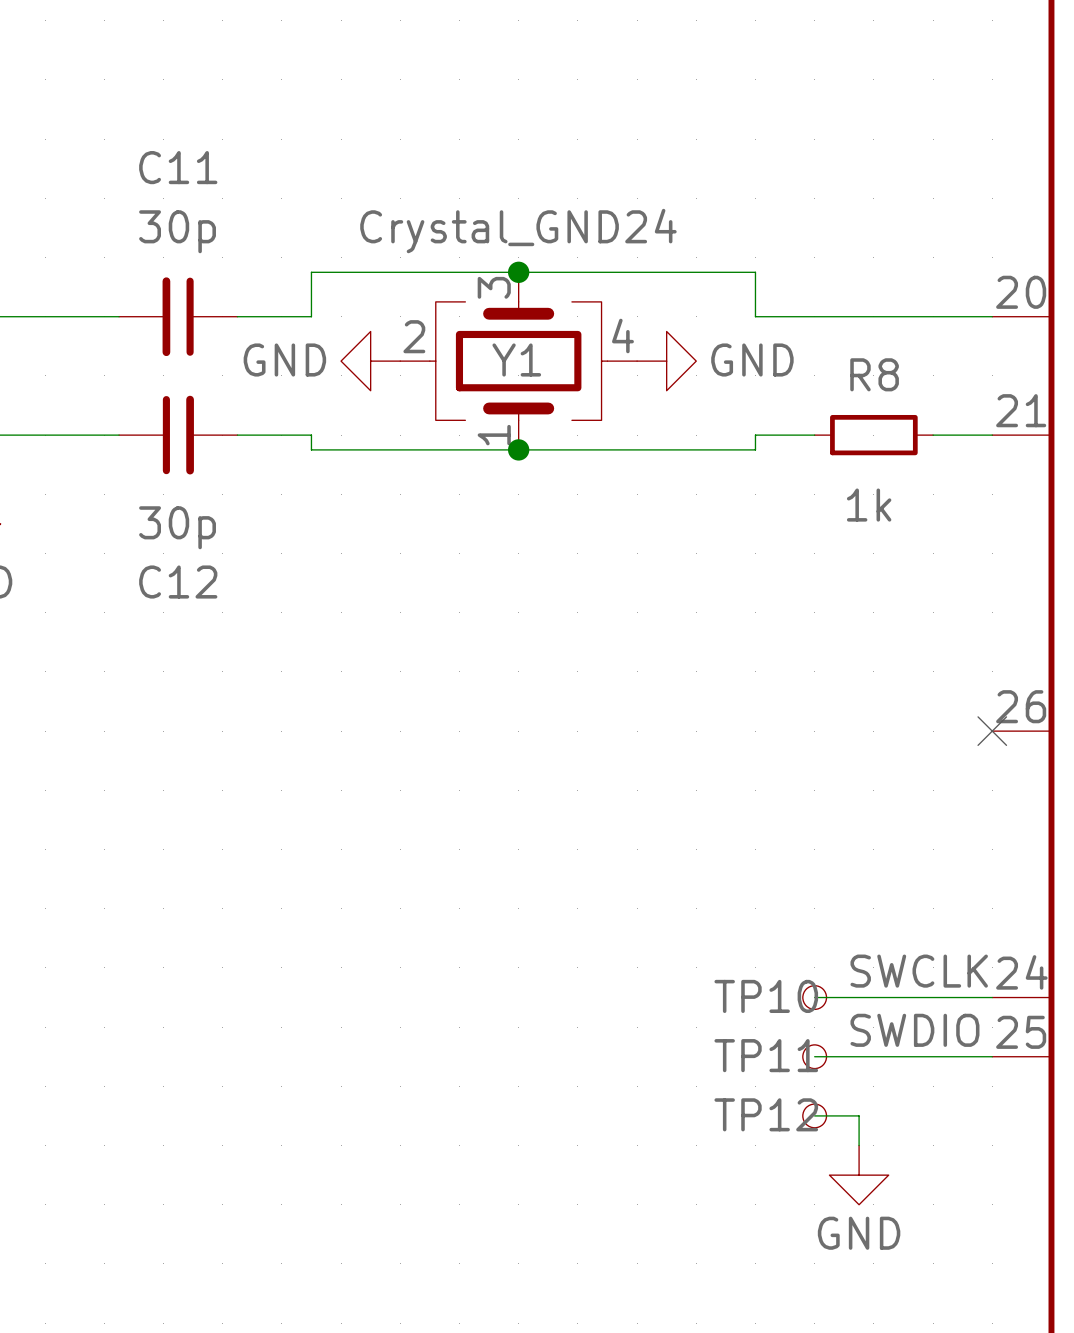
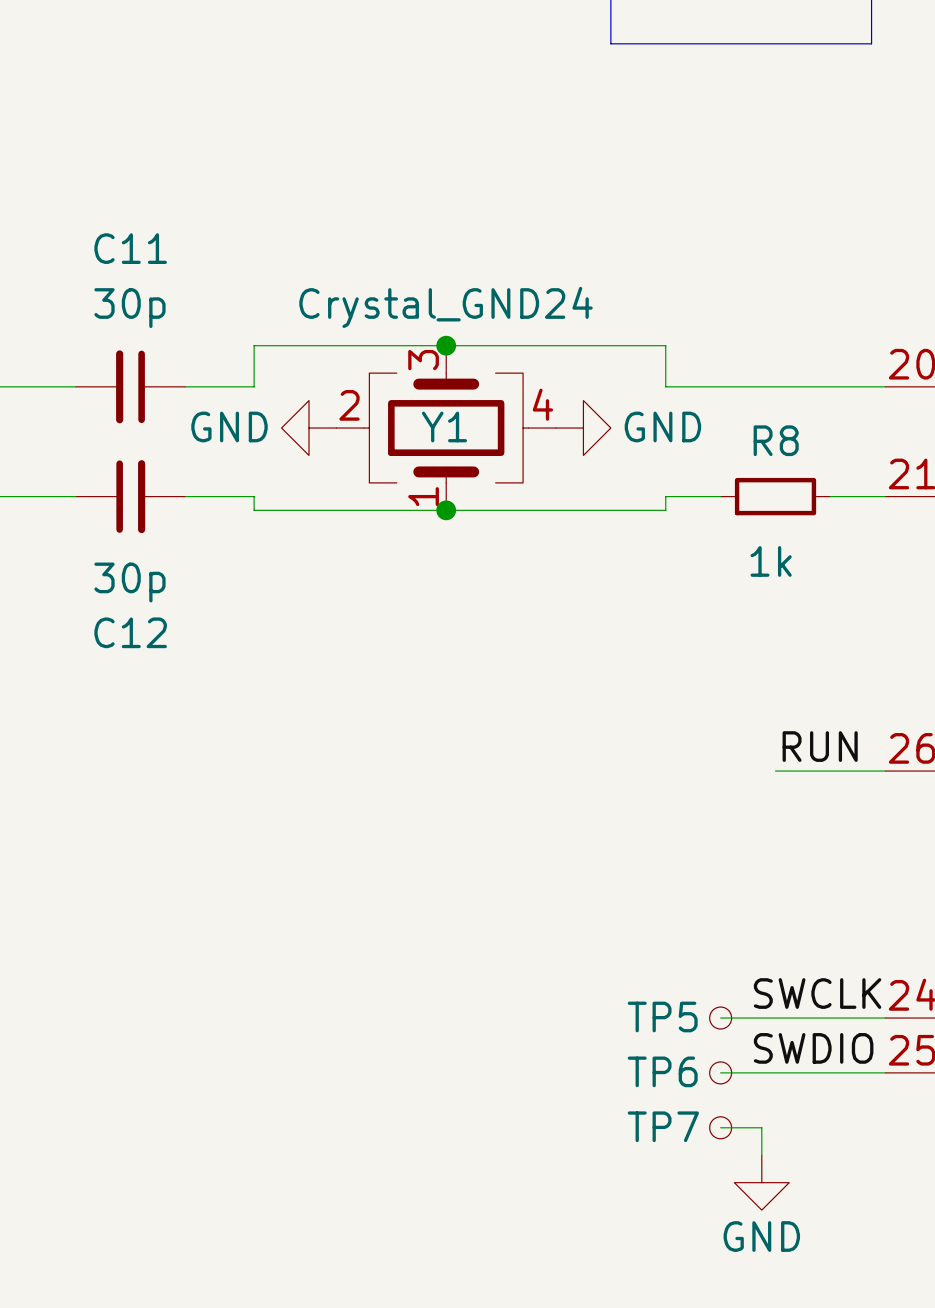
label: none -> RUN (820, 746)
wire: none -> (775, 771) (885, 771)
no-connect mark: (992, 731) -> none
TP10 name: TP10 (766, 996) -> TP5 (662, 1016)
TP11 name: TP11 (766, 1055) -> TP6 (662, 1071)
TP12 name: TP12 (766, 1114) -> TP7 (663, 1126)

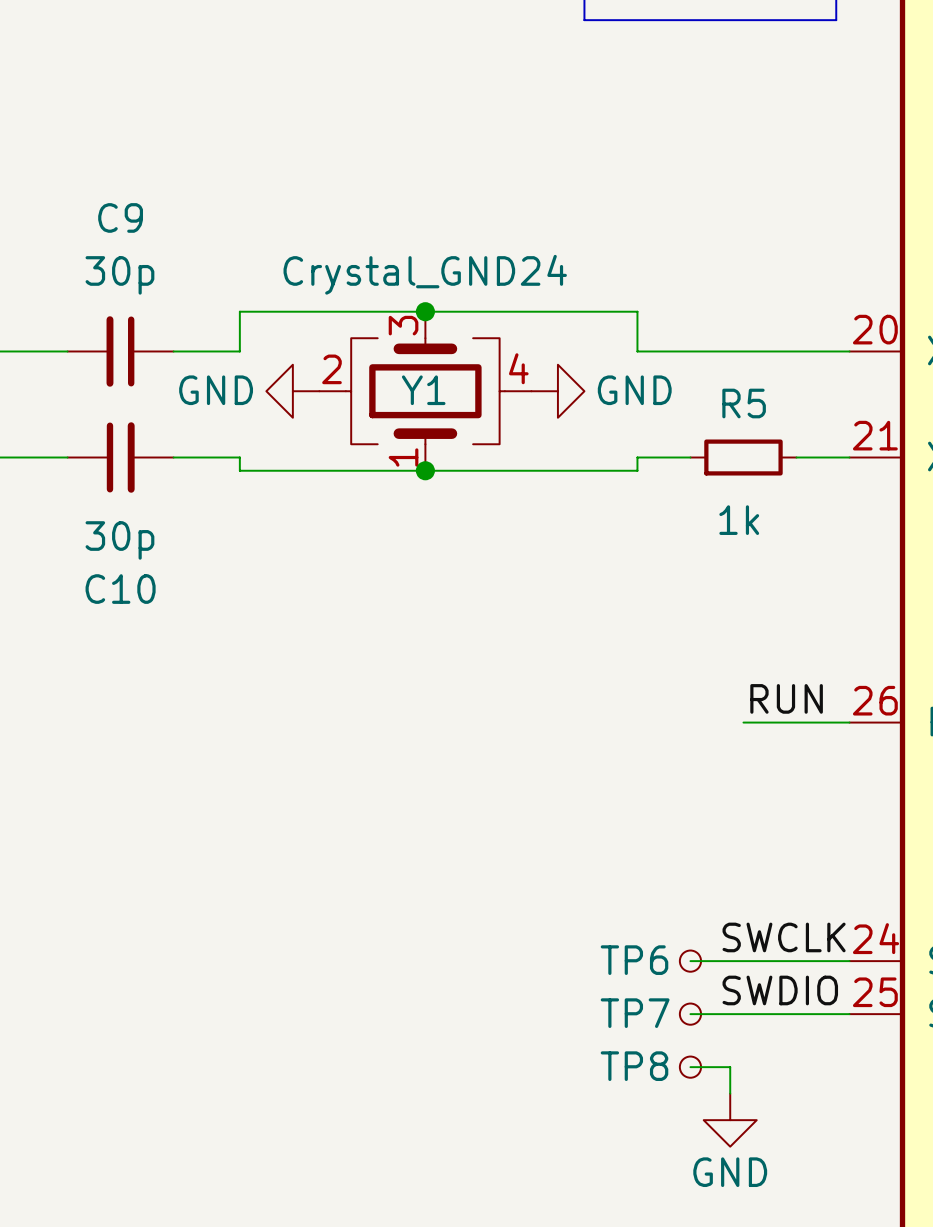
C11 name: C11 (130, 248) -> C9 (120, 217)
R8 name: R8 (776, 440) -> R5 (744, 403)
C12 name: C12 (130, 632) -> C10 (120, 589)
TP5 name: TP5 (662, 1016) -> TP6 (634, 960)
TP6 name: TP6 (662, 1071) -> TP7 (635, 1013)
TP7 name: TP7 (663, 1126) -> TP8 (634, 1066)

